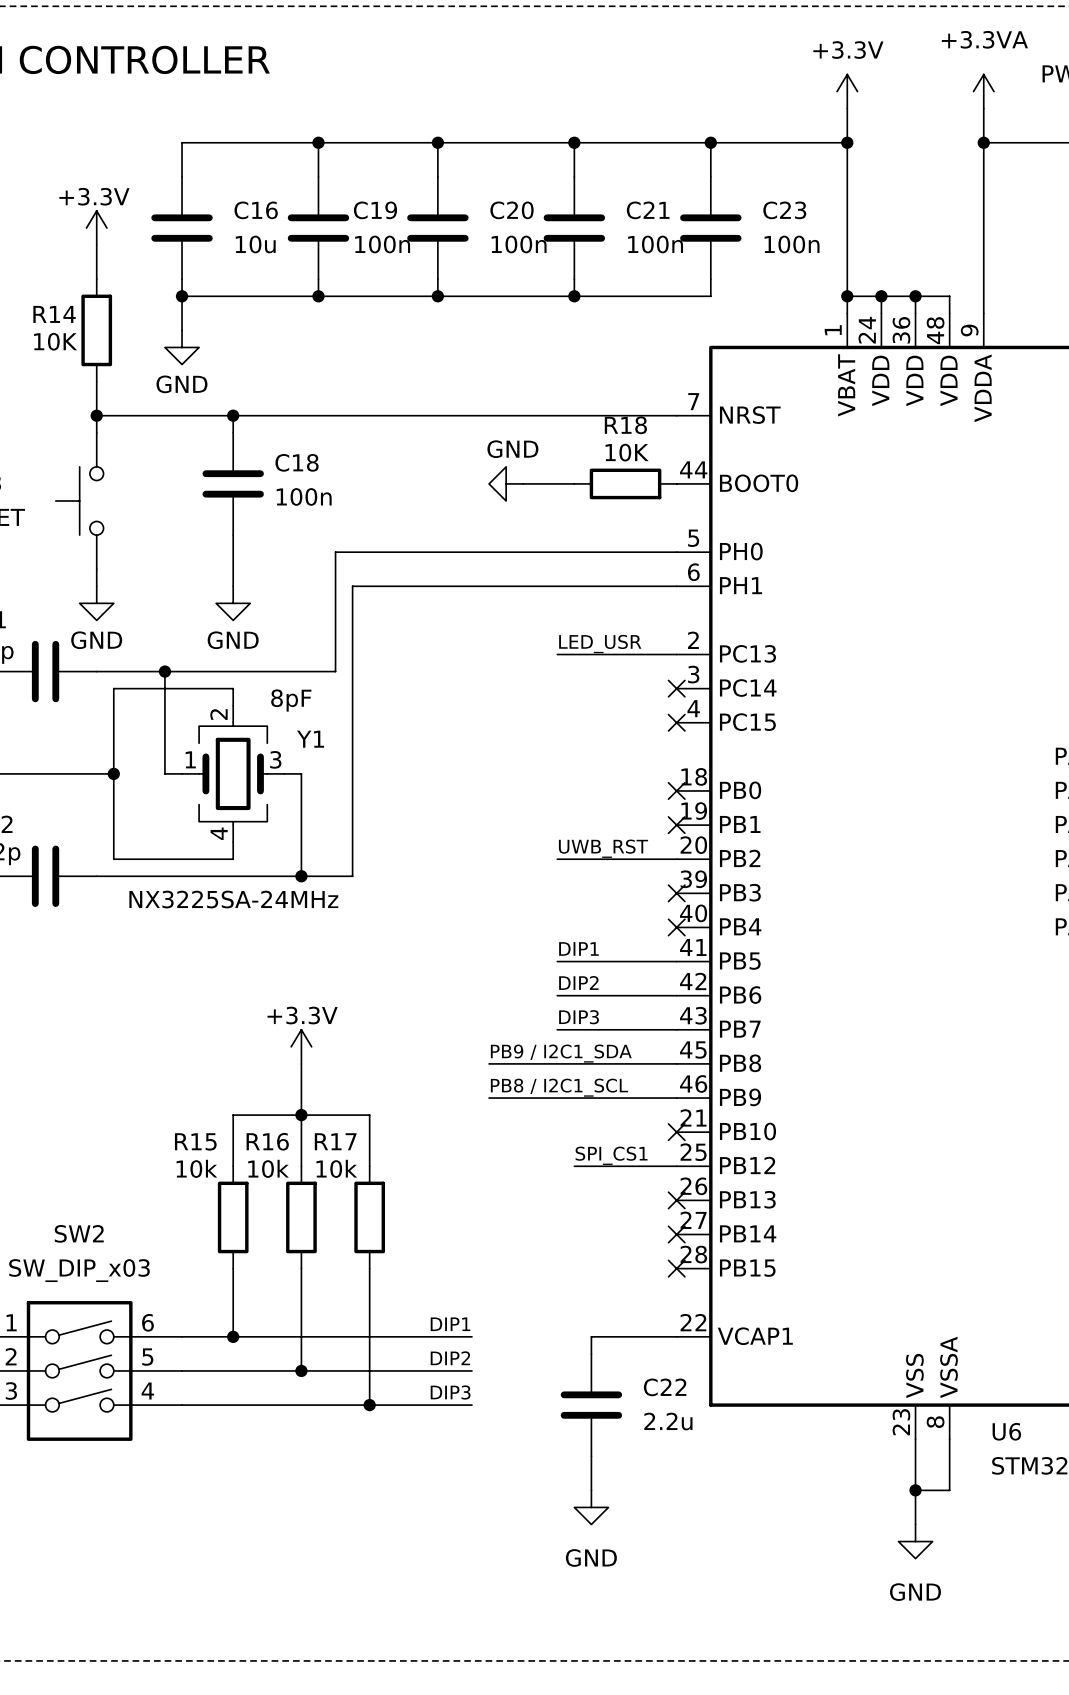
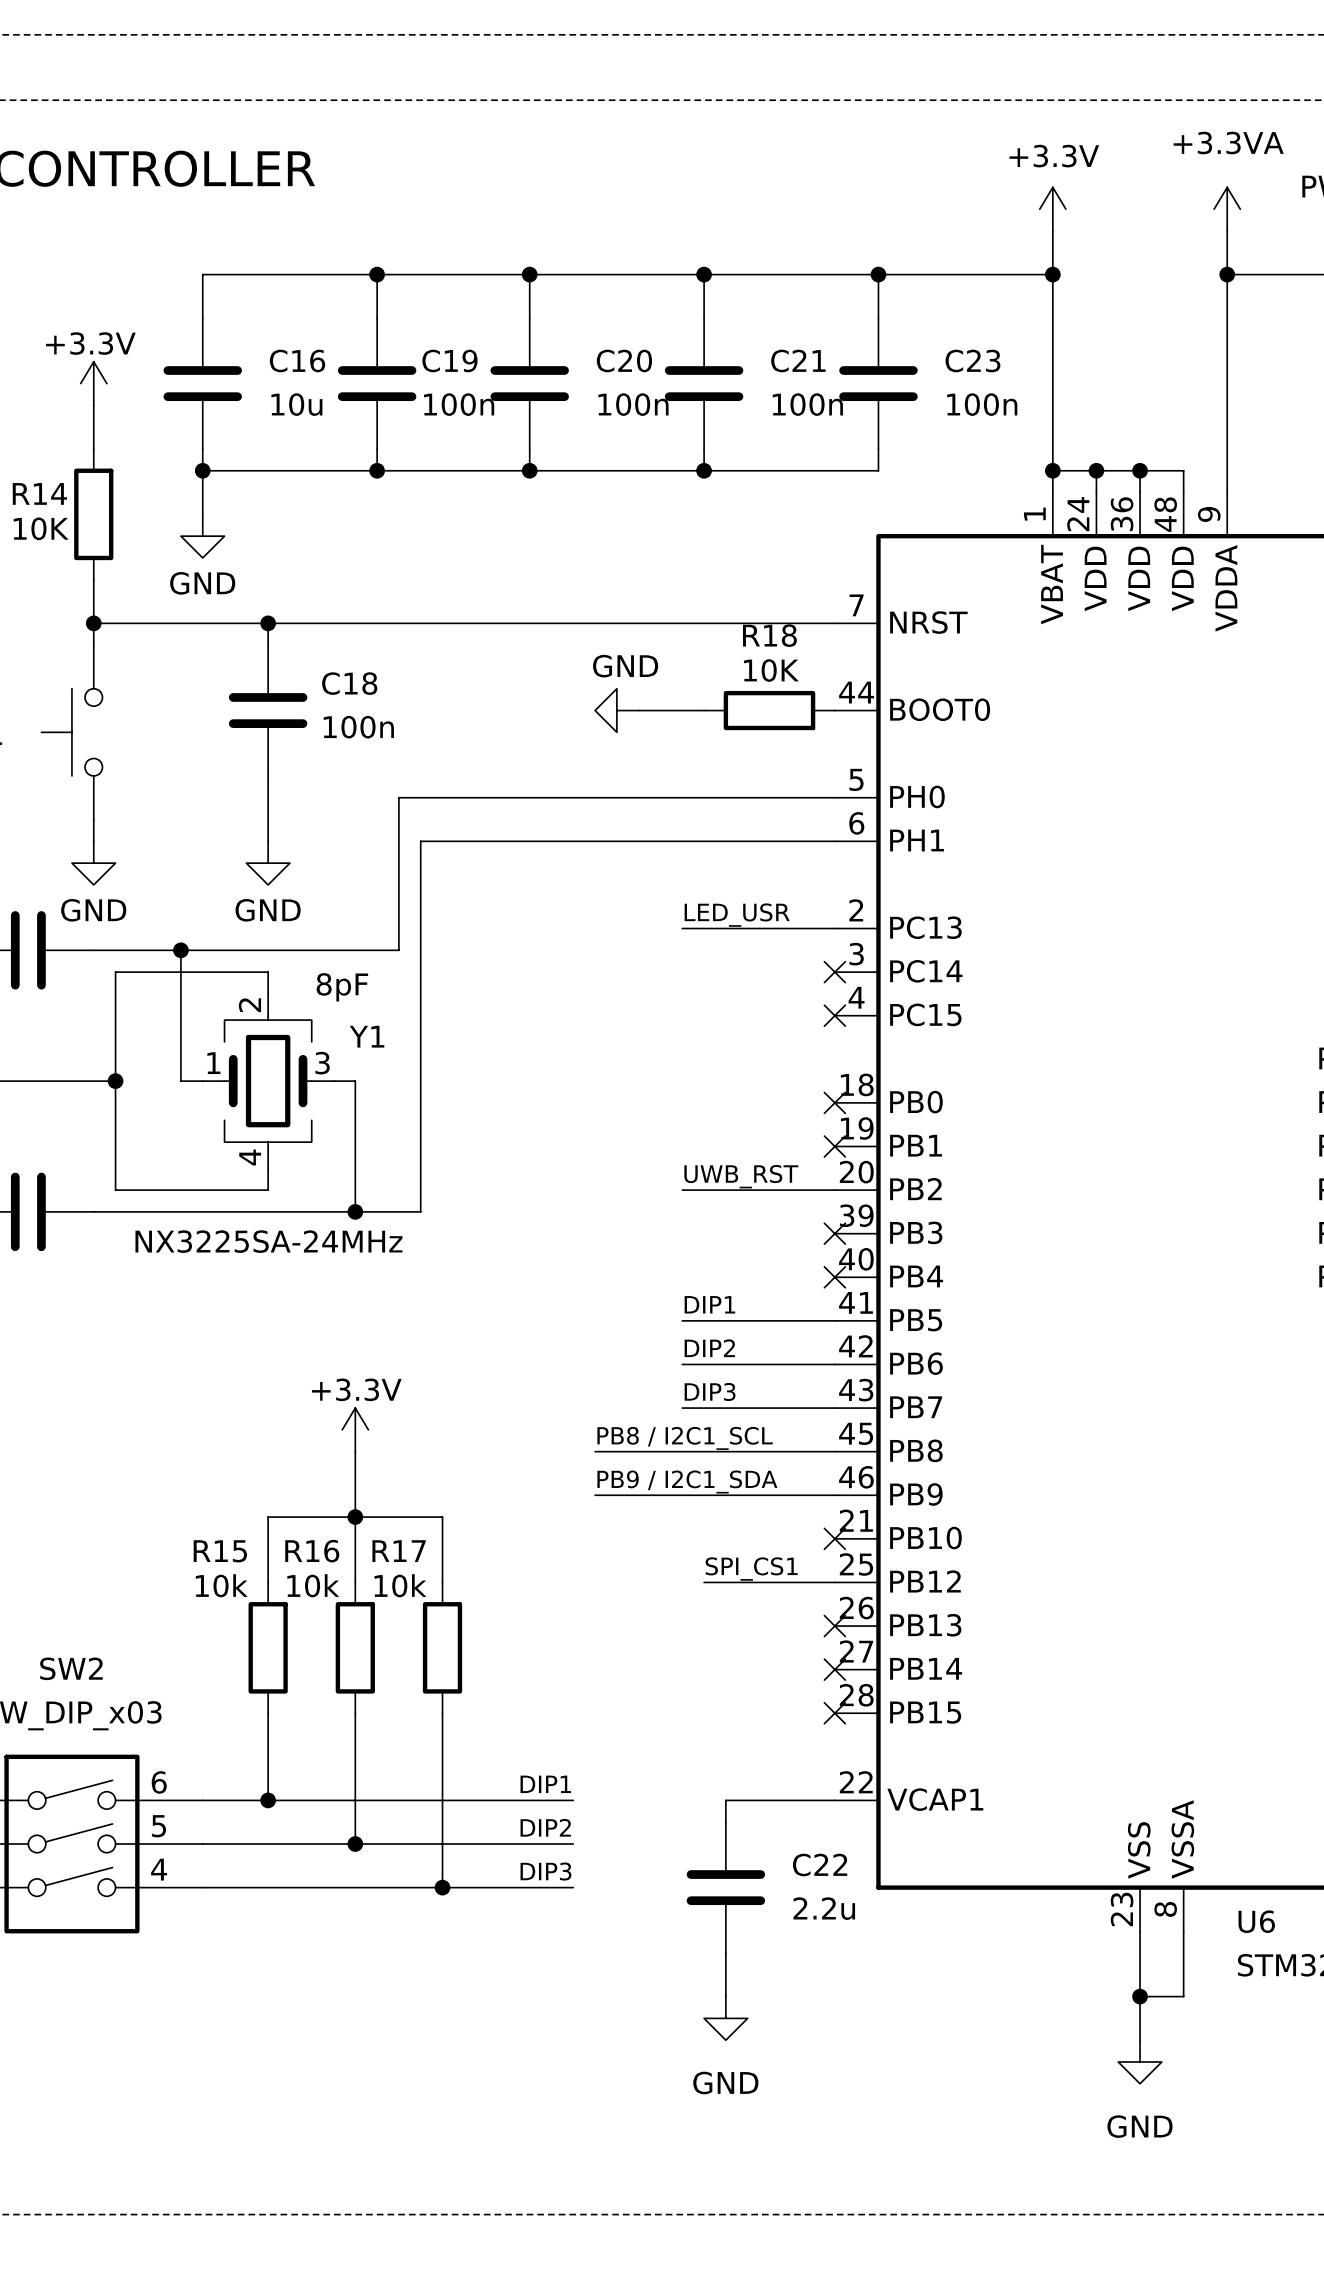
label: PB9 / I2C1_SDA (561, 1053) -> PB8 / I2C1_SCL (685, 1438)
label: PB8 / I2C1_SCL (559, 1087) -> PB9 / I2C1_SDA (687, 1482)

